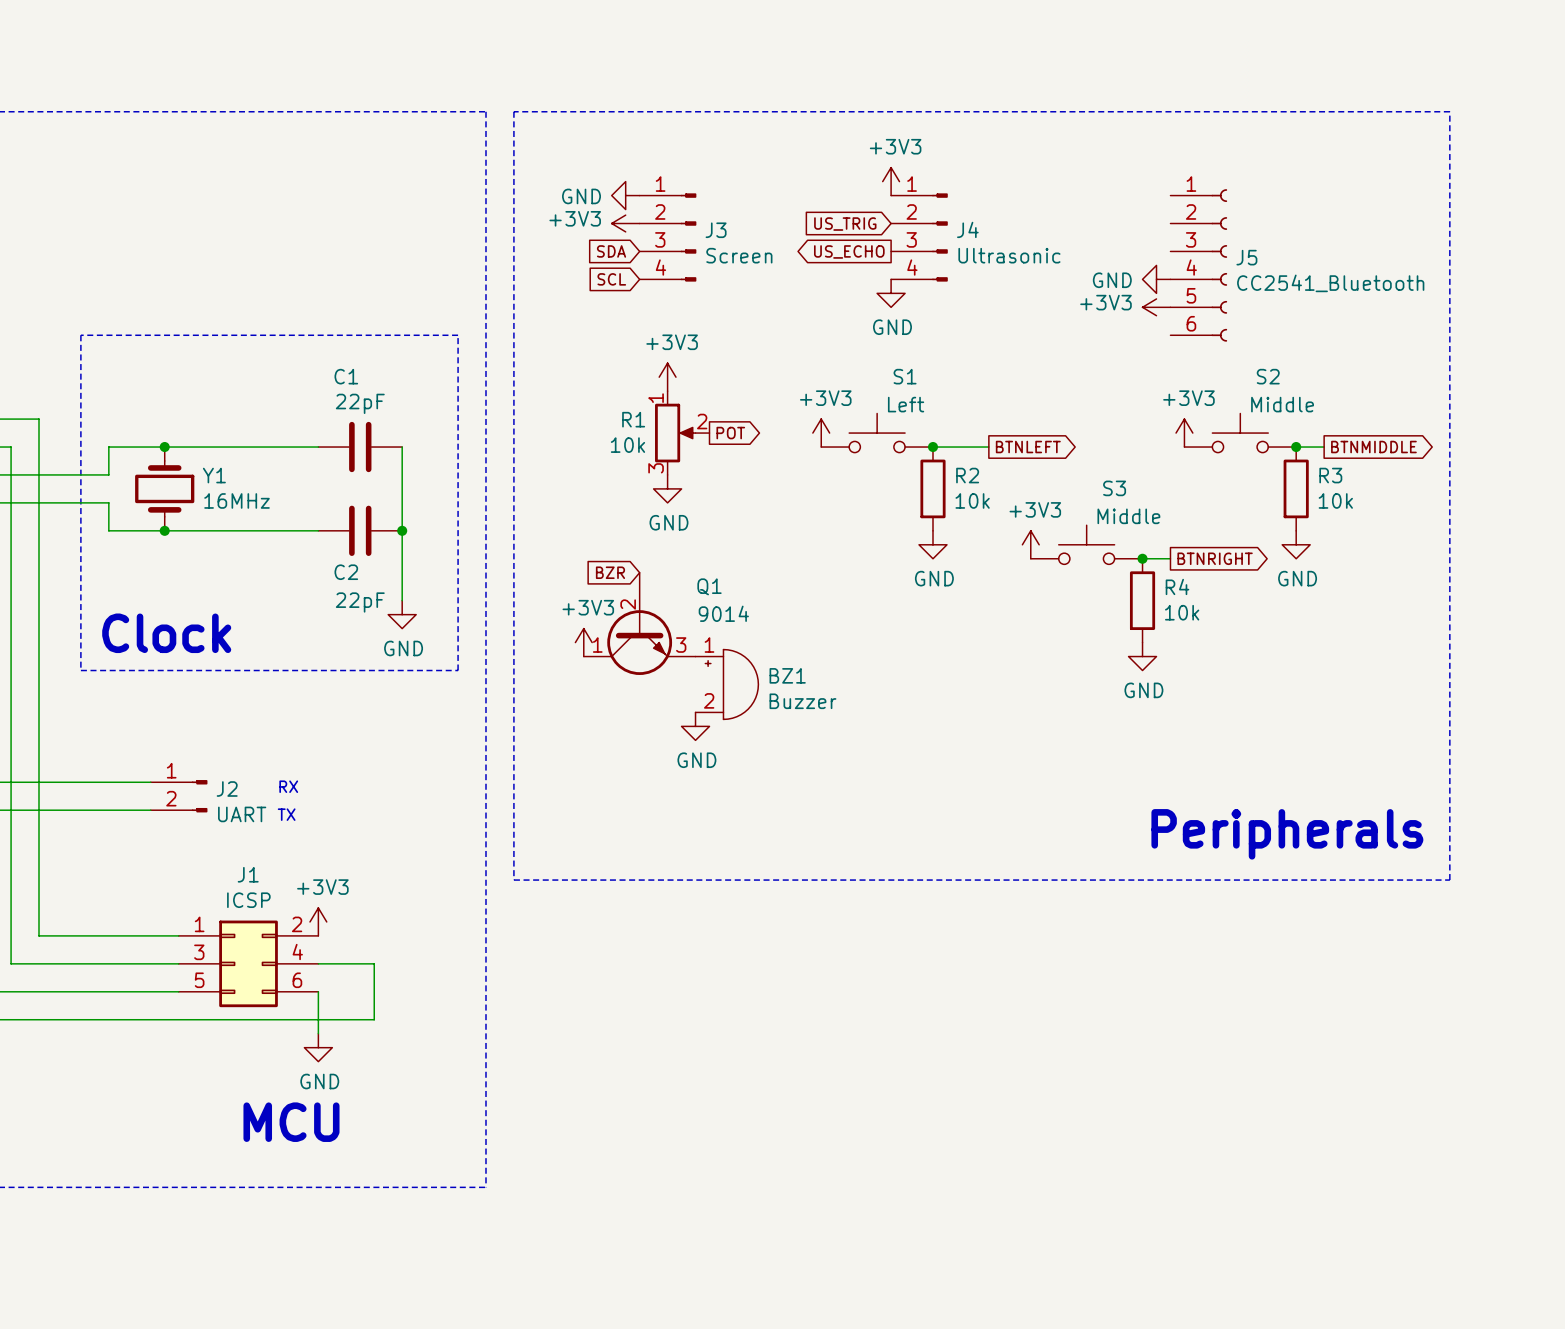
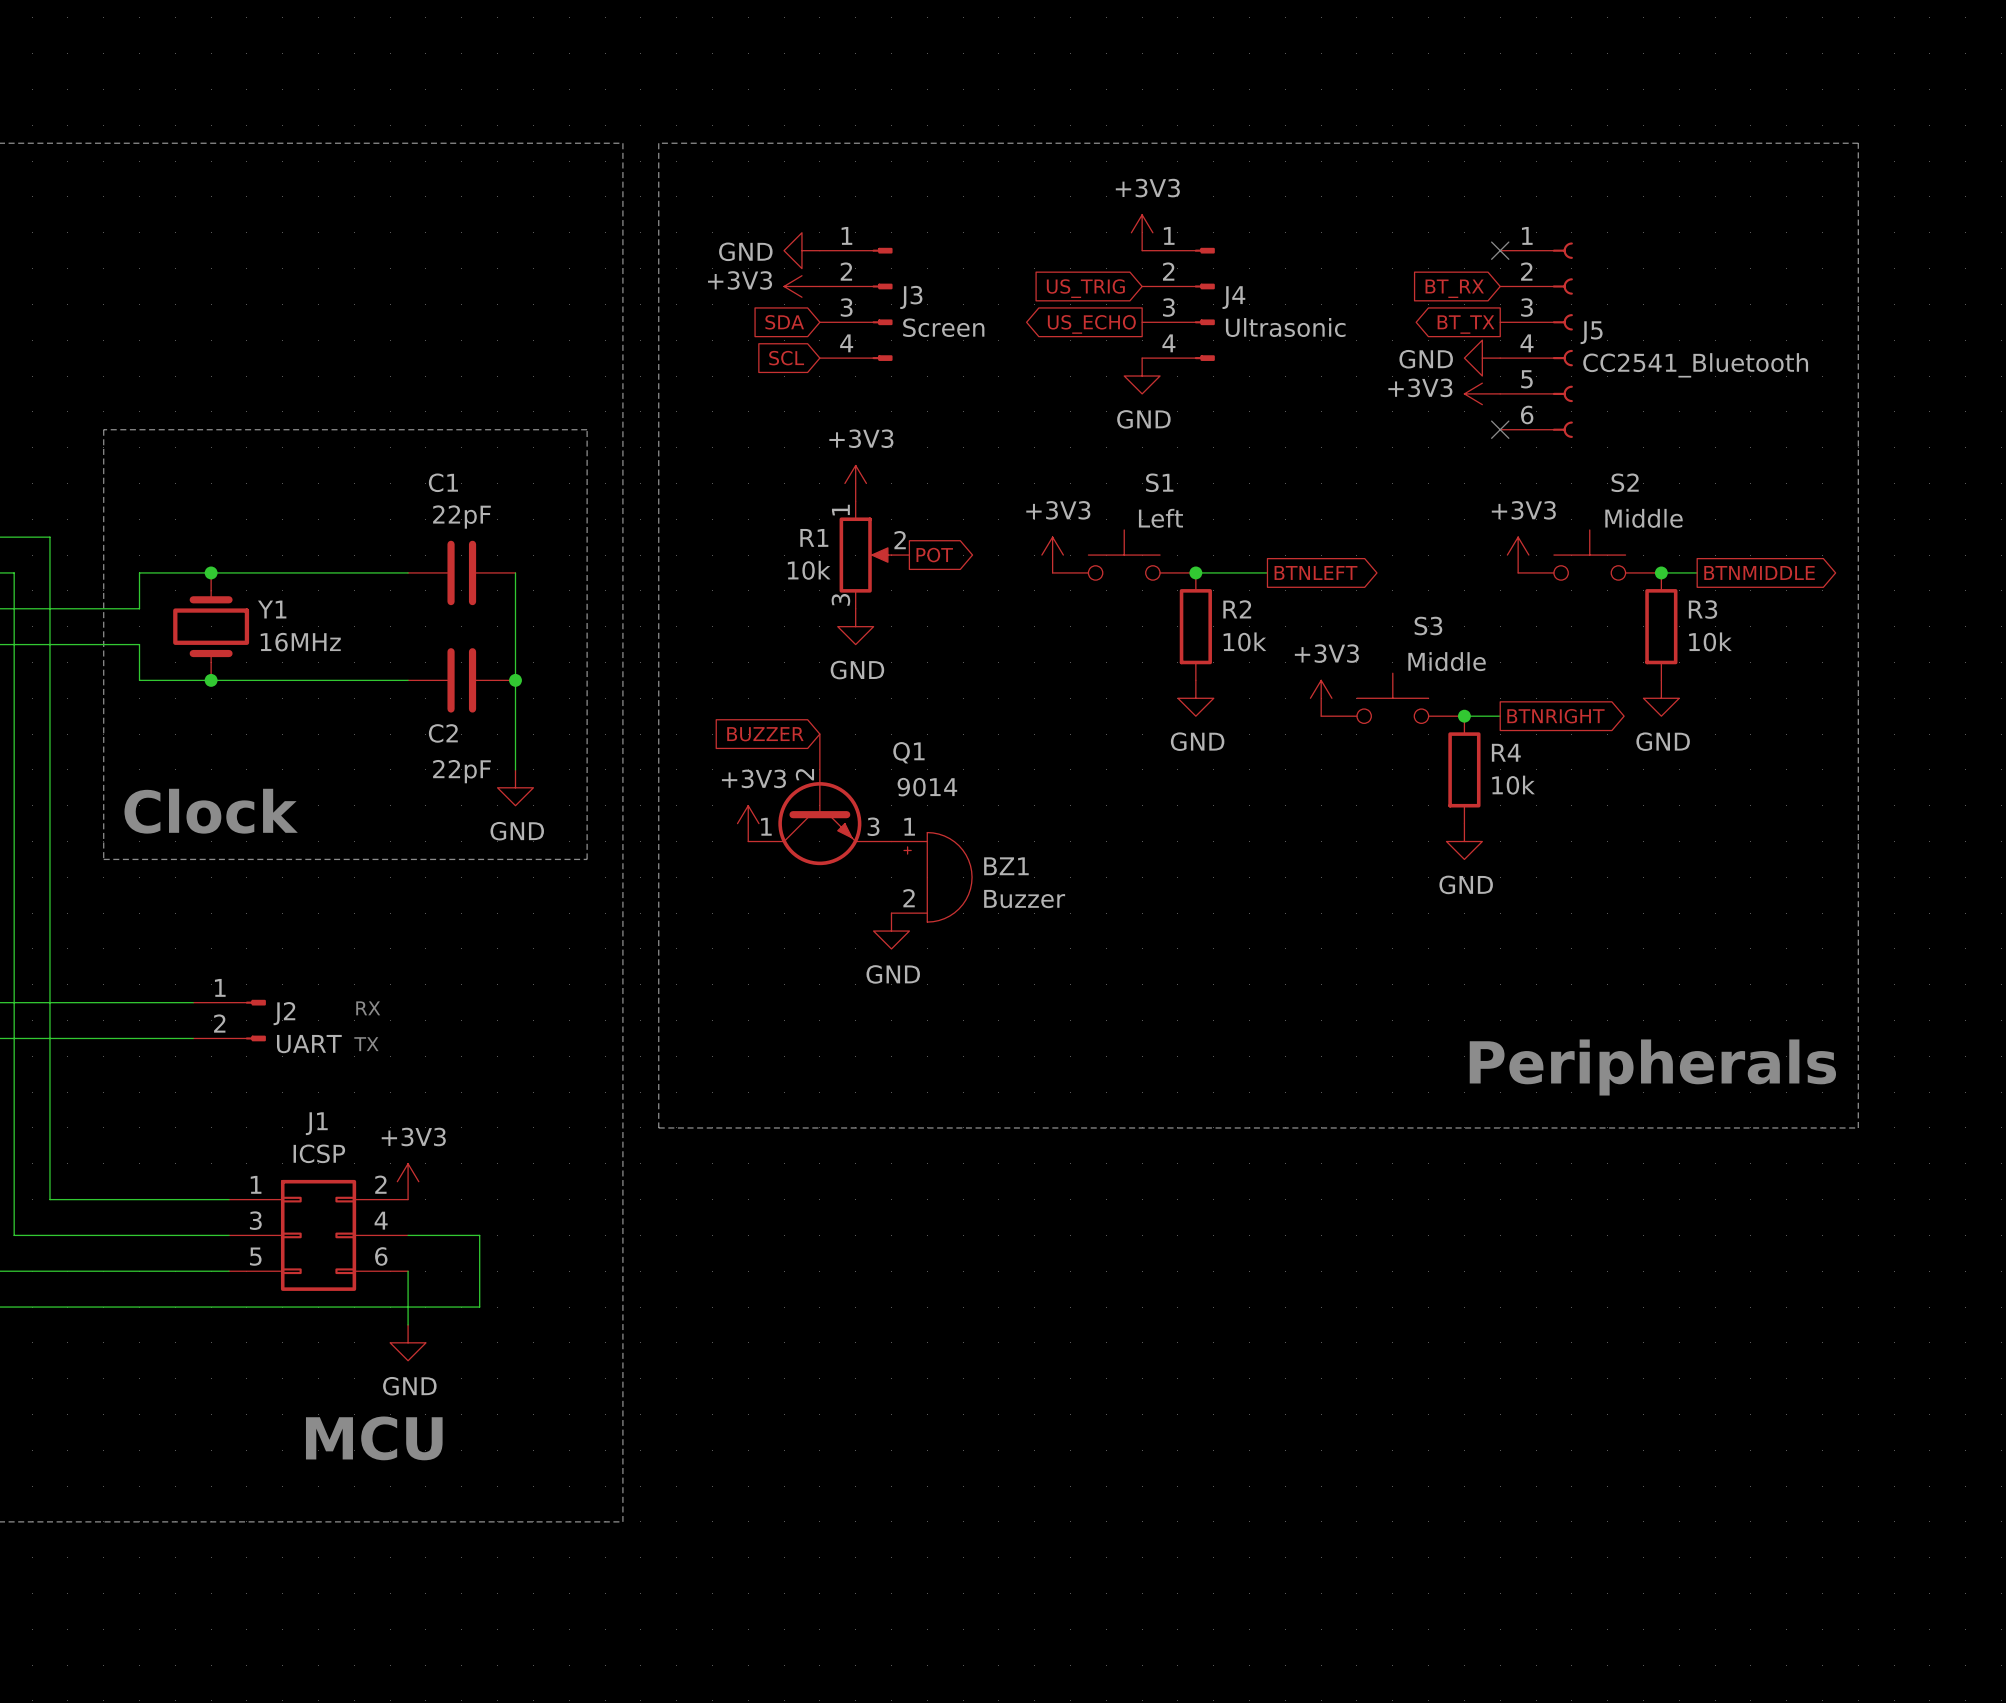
no-connect mark: none -> (1500, 250)
global label: none -> BT_RX (1454, 288)
global label: none -> BT_TX (1466, 324)
no-connect mark: none -> (1500, 429)
global label: BZR (610, 572) -> BUZZER (765, 734)

